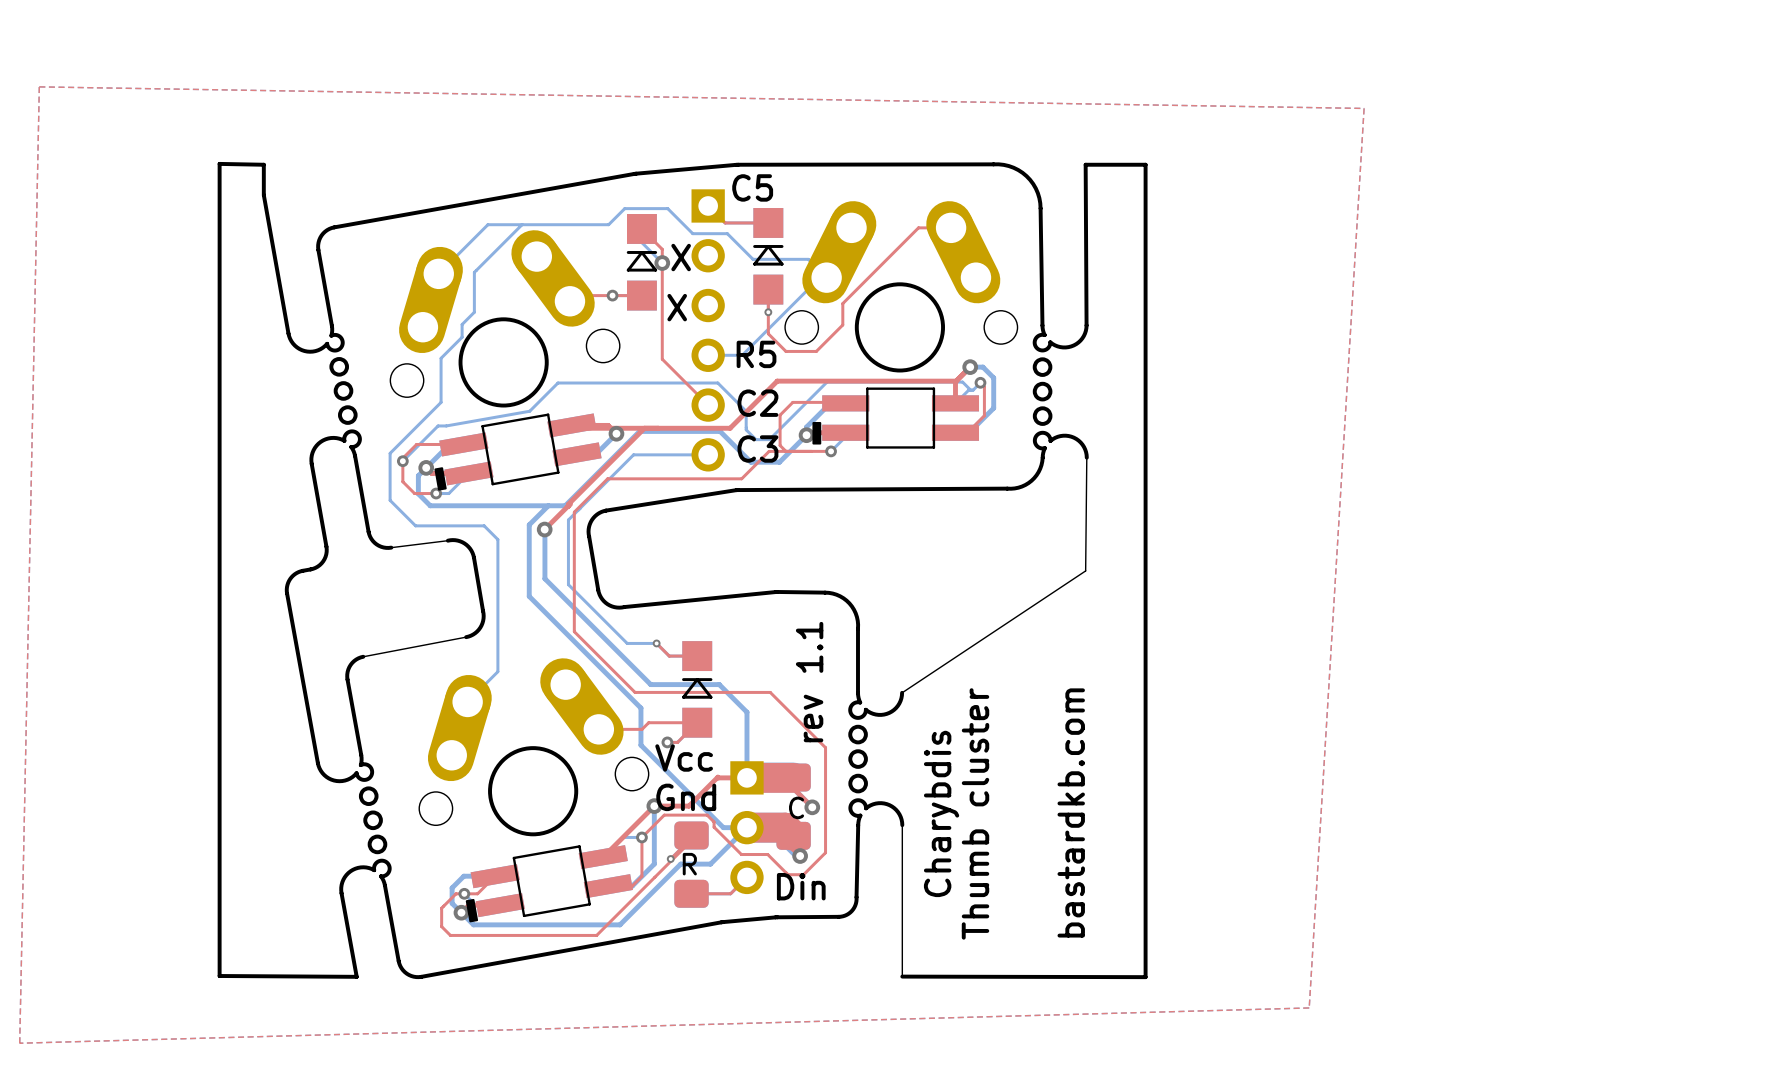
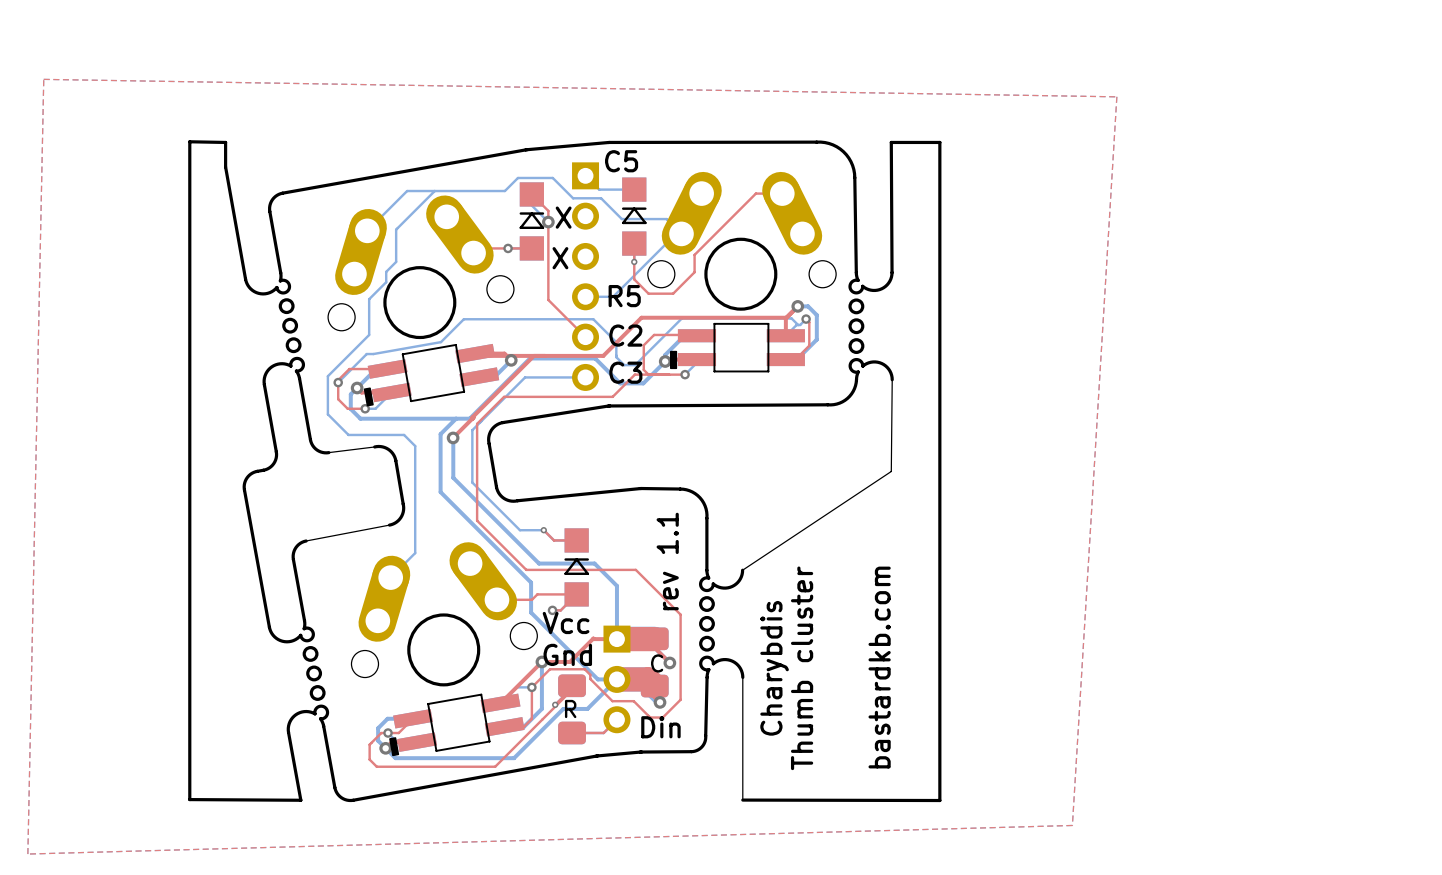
top track: (708, 205) (725, 222) (768, 222) -> none

